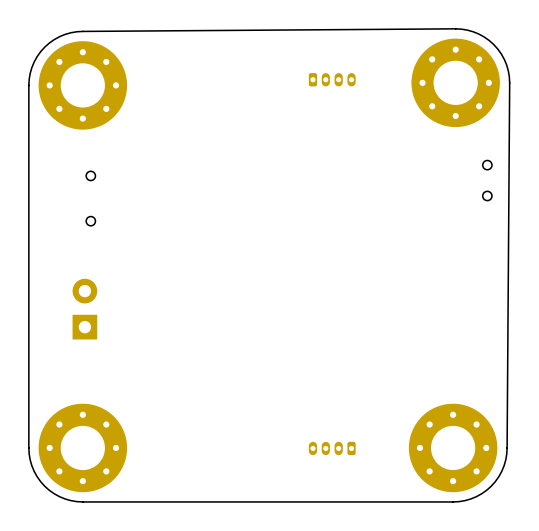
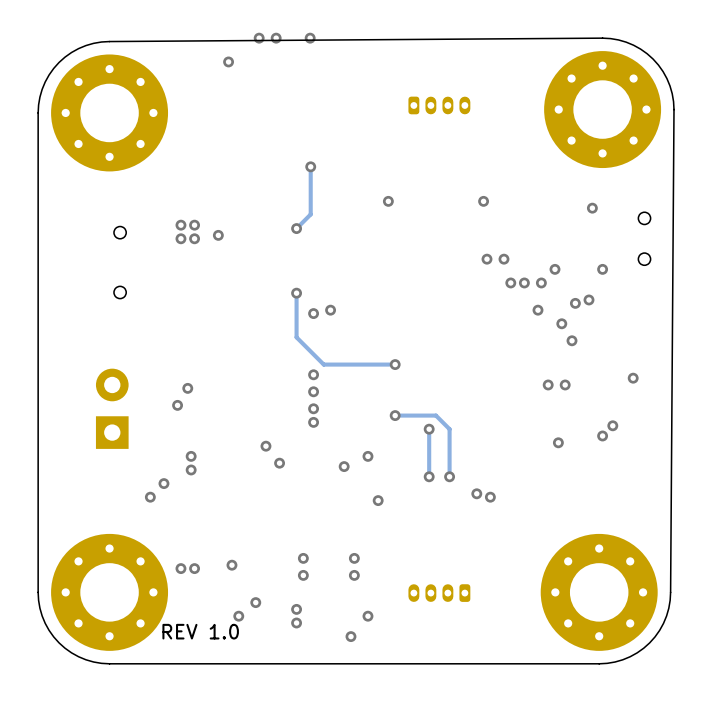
via: none -> (259, 38)
via: none -> (276, 38)
via: none -> (310, 38)
via: none -> (228, 61)
track: none -> (310, 166) (310, 214) (296, 228)
via: none -> (310, 166)
via: none -> (388, 201)
via: none -> (483, 201)
via: none -> (592, 208)
via: none -> (180, 225)
via: none -> (194, 225)
via: none -> (296, 228)
via: none -> (218, 235)
via: none -> (180, 238)
via: none -> (194, 238)
via: none -> (486, 259)
via: none -> (503, 259)
via: none -> (554, 269)
via: none -> (602, 269)
via: none -> (510, 282)
via: none -> (524, 282)
via: none -> (541, 282)
track: none -> (296, 293) (296, 337) (323, 364) (395, 364)
via: none -> (296, 293)
via: none -> (588, 299)
via: none -> (575, 303)
via: none -> (330, 310)
via: none -> (537, 310)
via: none -> (313, 313)
via: none -> (561, 323)
via: none -> (571, 340)
via: none -> (395, 364)
via: none -> (313, 374)
via: none -> (633, 378)
via: none -> (548, 384)
via: none -> (565, 384)
via: none -> (187, 388)
via: none -> (313, 391)
via: none -> (177, 405)
via: none -> (313, 408)
track: none -> (395, 415) (435, 415) (449, 429) (449, 476)
via: none -> (395, 415)
via: none -> (313, 422)
via: none -> (612, 425)
track: none -> (429, 429) (429, 476)
via: none -> (429, 429)
via: none -> (602, 435)
via: none -> (558, 442)
via: none -> (265, 446)
via: none -> (191, 456)
via: none -> (367, 456)
via: none -> (279, 463)
via: none -> (344, 466)
via: none -> (191, 469)
via: none -> (429, 476)
via: none -> (449, 476)
via: none -> (163, 483)
via: none -> (476, 493)
via: none -> (150, 497)
via: none -> (490, 497)
via: none -> (378, 500)
via: none -> (303, 558)
via: none -> (354, 558)
via: none -> (231, 565)
via: none -> (180, 568)
via: none -> (194, 568)
via: none -> (303, 575)
via: none -> (354, 575)
via: none -> (255, 602)
via: none -> (296, 609)
via: none -> (238, 616)
via: none -> (367, 616)
via: none -> (296, 623)
text: none -> REV 1.0 (200, 631)
via: none -> (350, 636)

